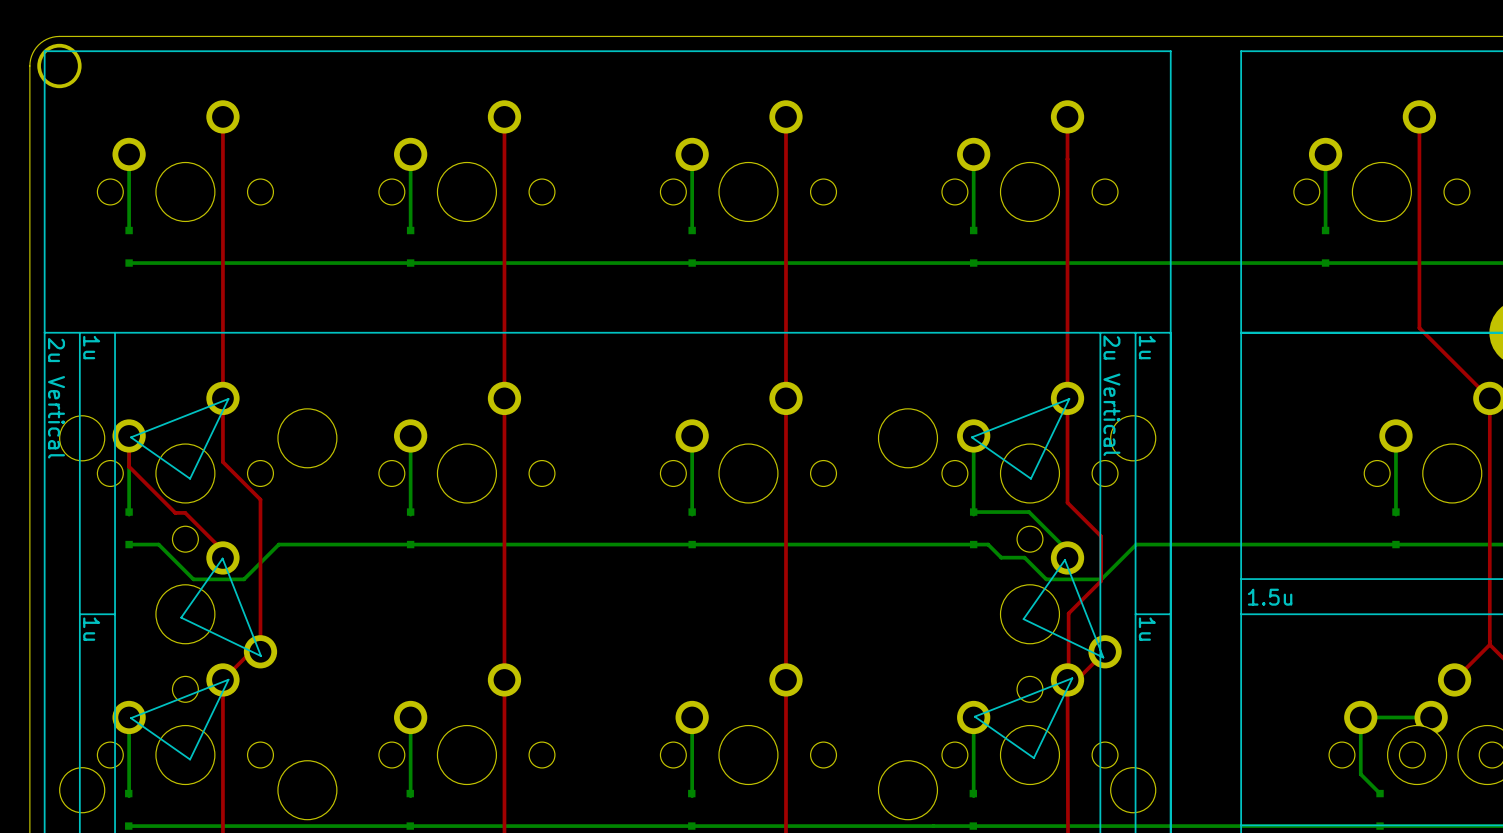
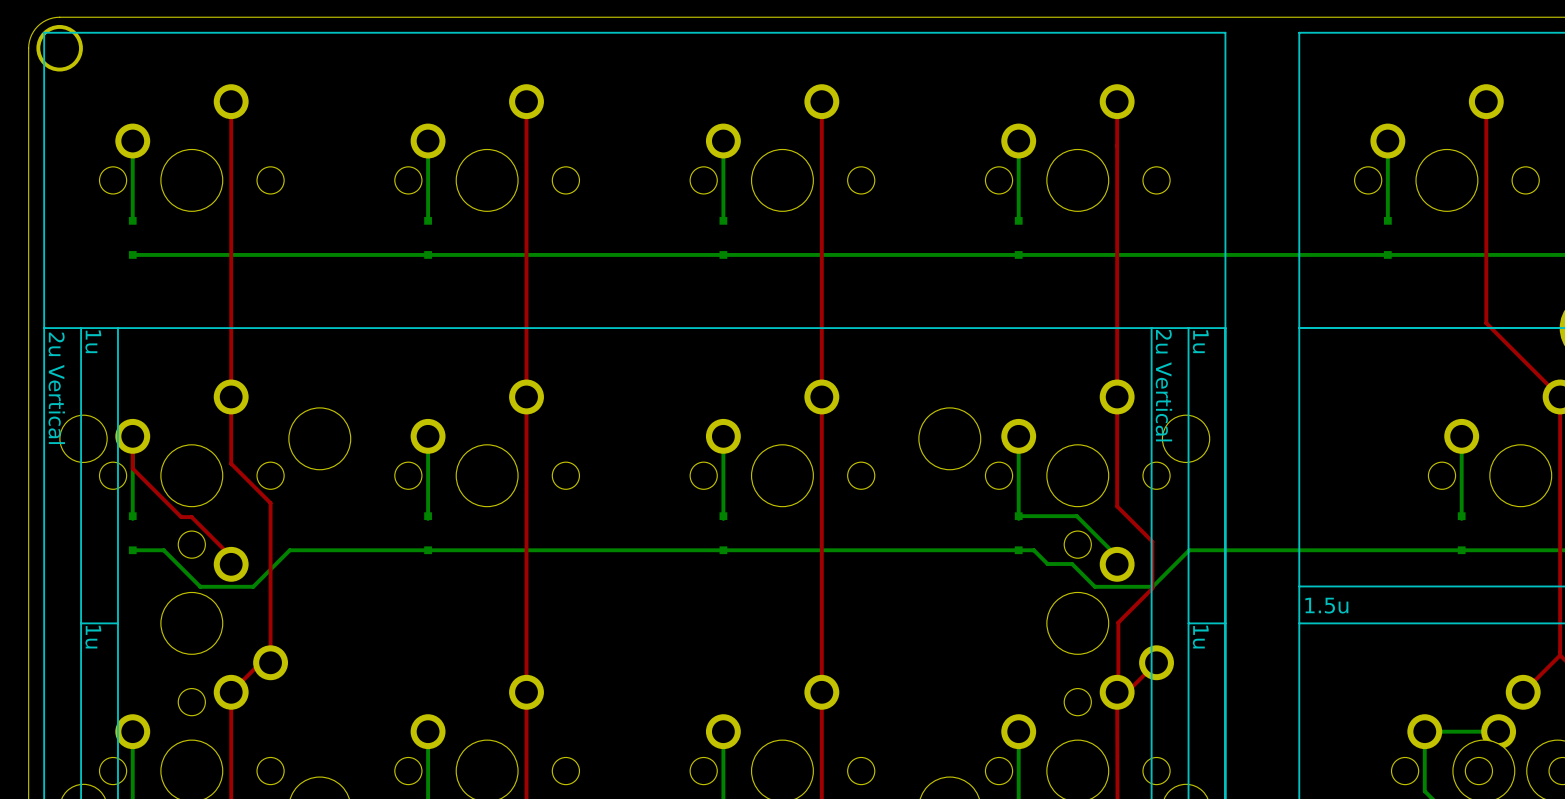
line: (228, 398) (190, 478) (130, 437) (228, 398) -> none
line: (1069, 398) (1030, 478) (971, 437) (1069, 398) -> none
line: (222, 558) (261, 656) (181, 617) (222, 558) -> none
line: (1064, 560) (1103, 657) (1023, 619) (1064, 560) -> none
line: (1072, 678) (974, 716) (1033, 758) (1072, 678) -> none
line: (228, 679) (190, 759) (130, 718) (228, 679) -> none

